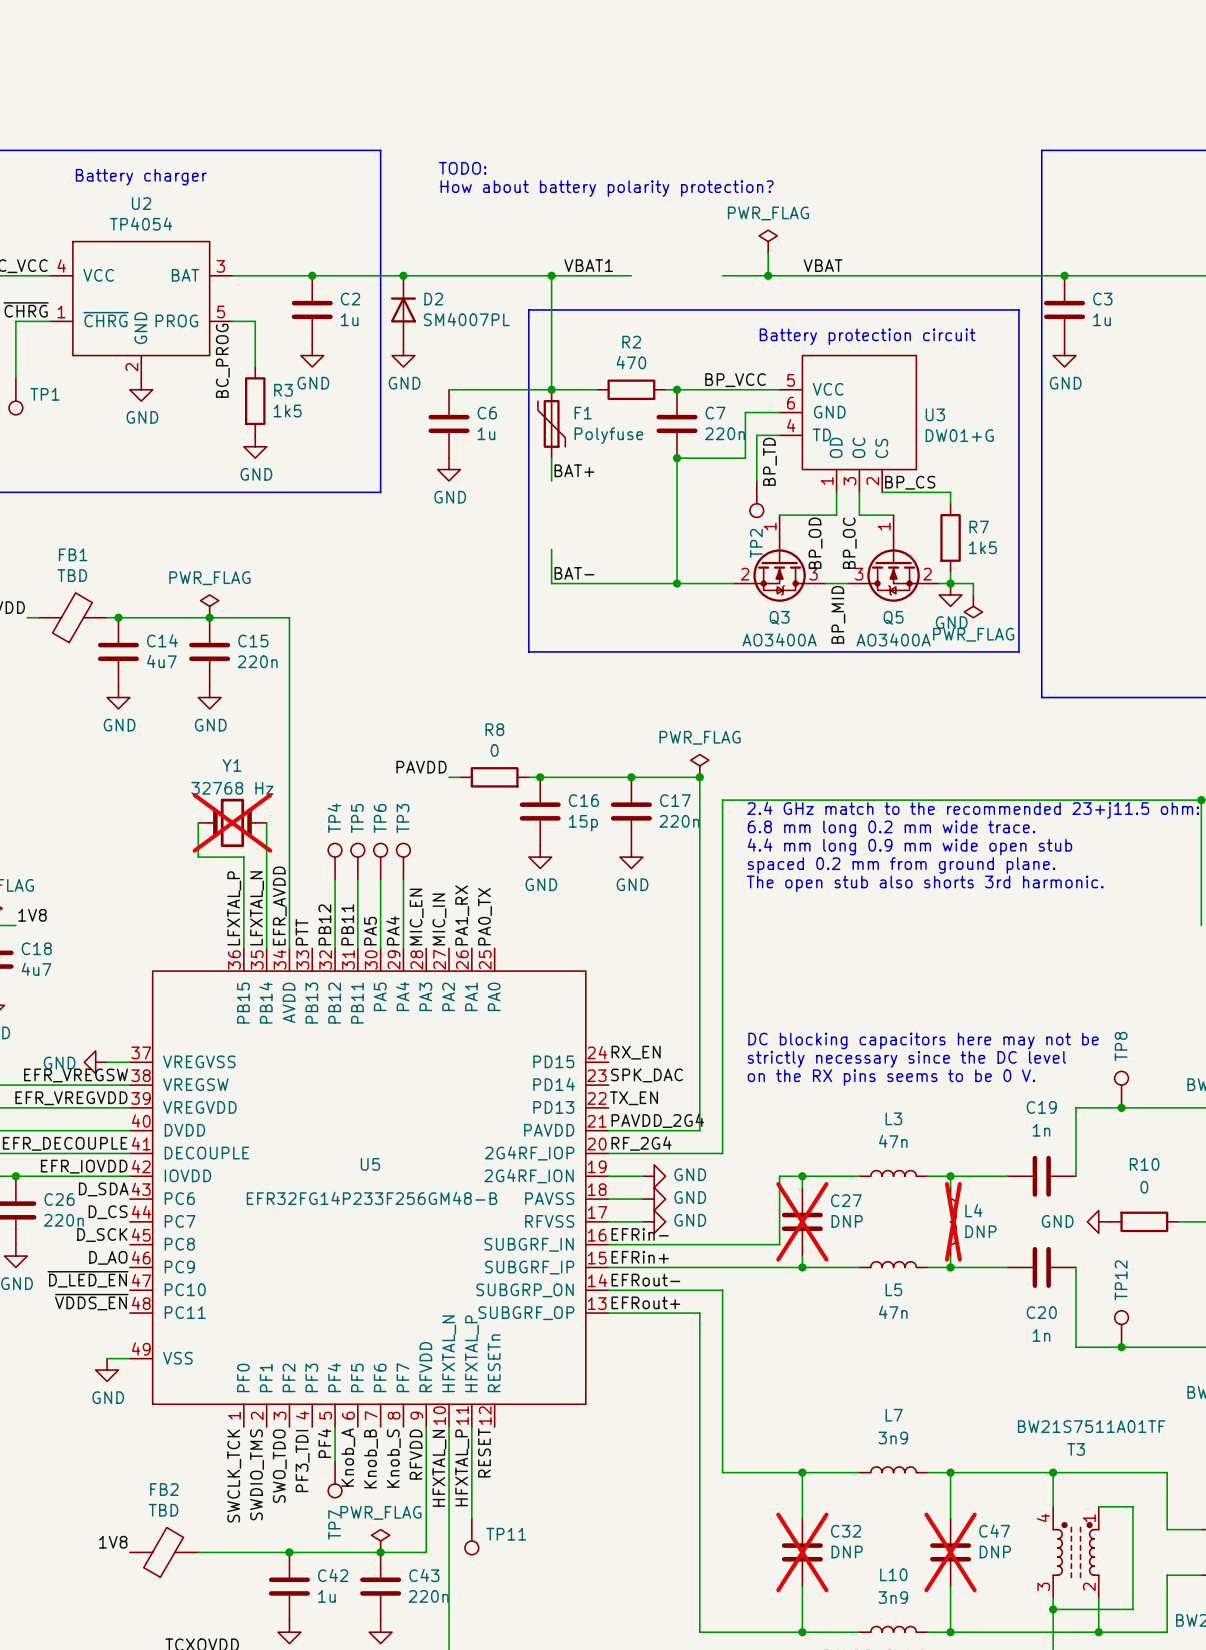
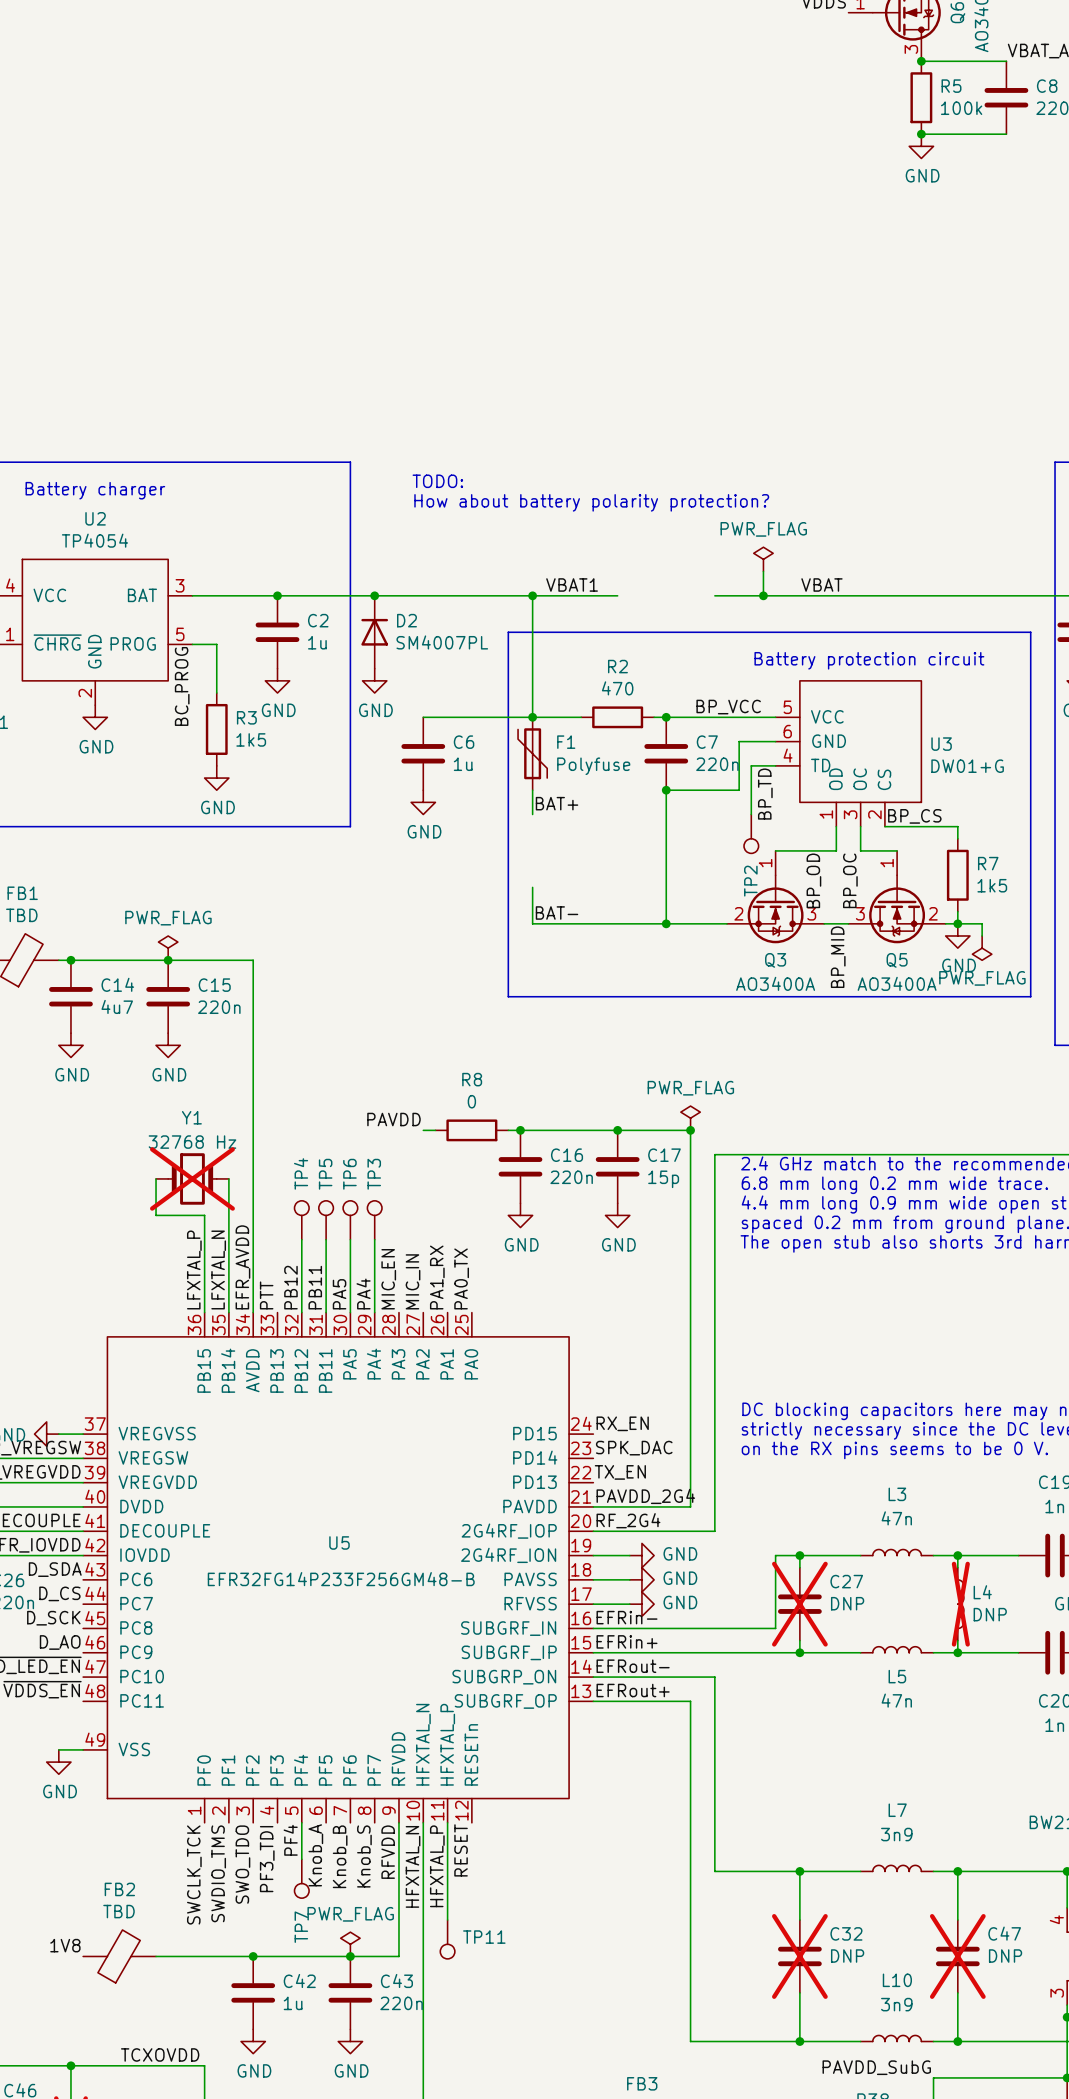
C17 value: 220n (679, 821) -> 15p (663, 1179)
C16 value: 15p (583, 823) -> 220n (571, 1177)

